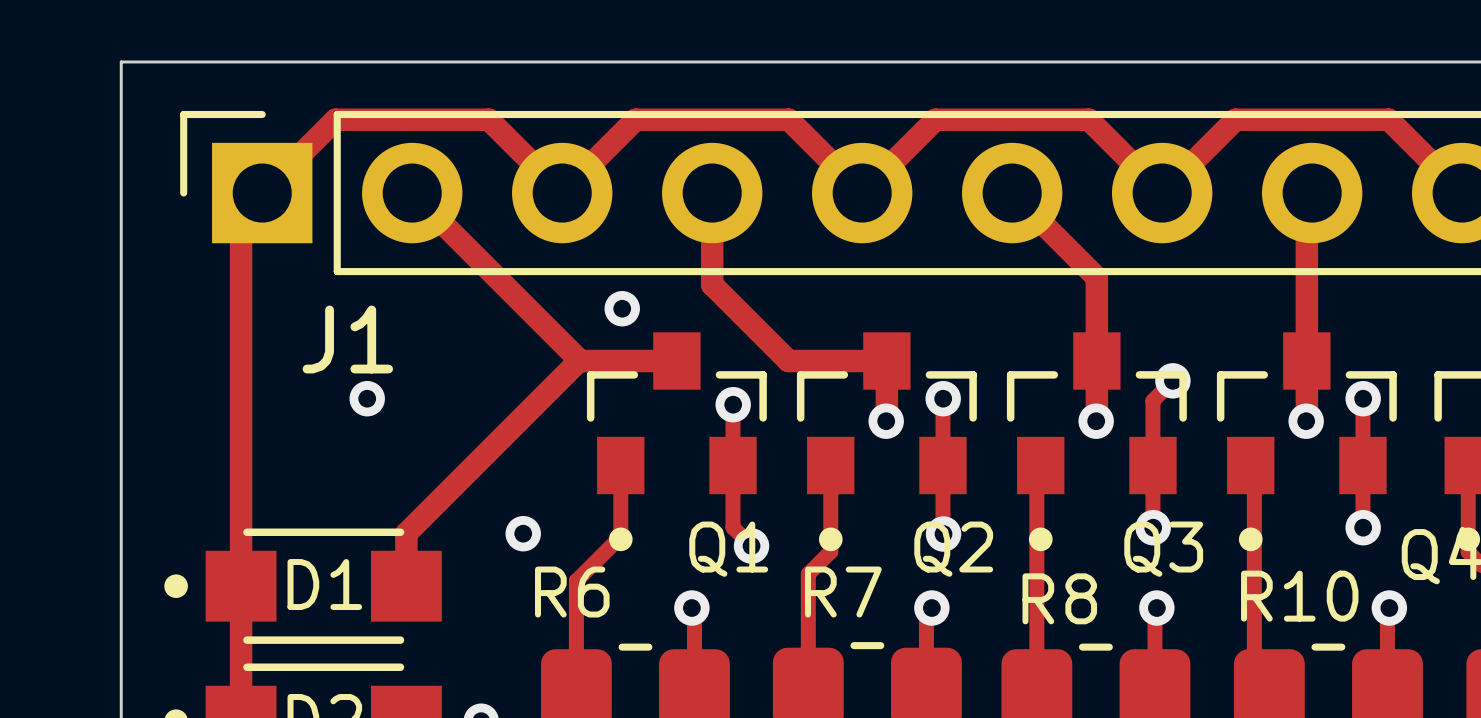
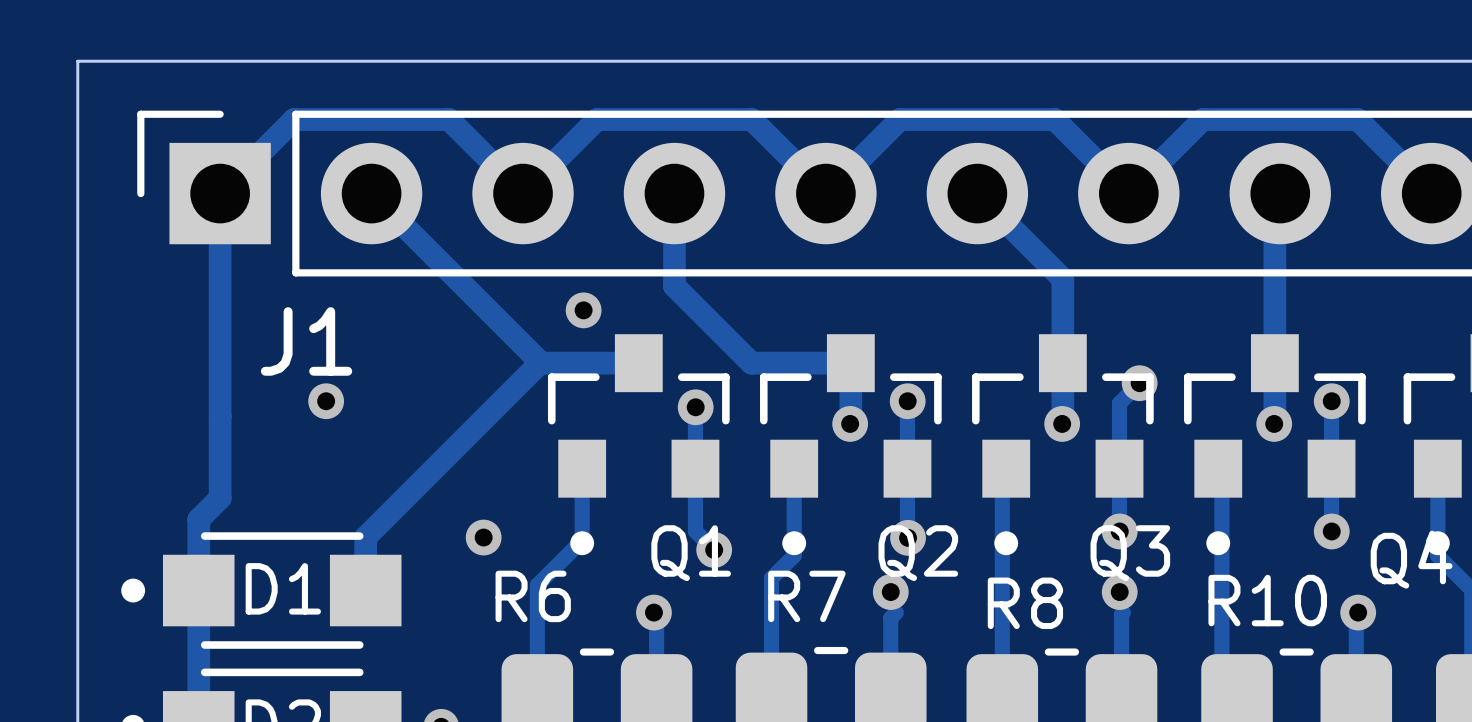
track: (262, 193) (241, 214) (241, 515) -> (220, 193) (220, 498) (198, 519)
via position: (931, 608) -> (890, 592)
via position: (1156, 608) -> (1119, 592)

